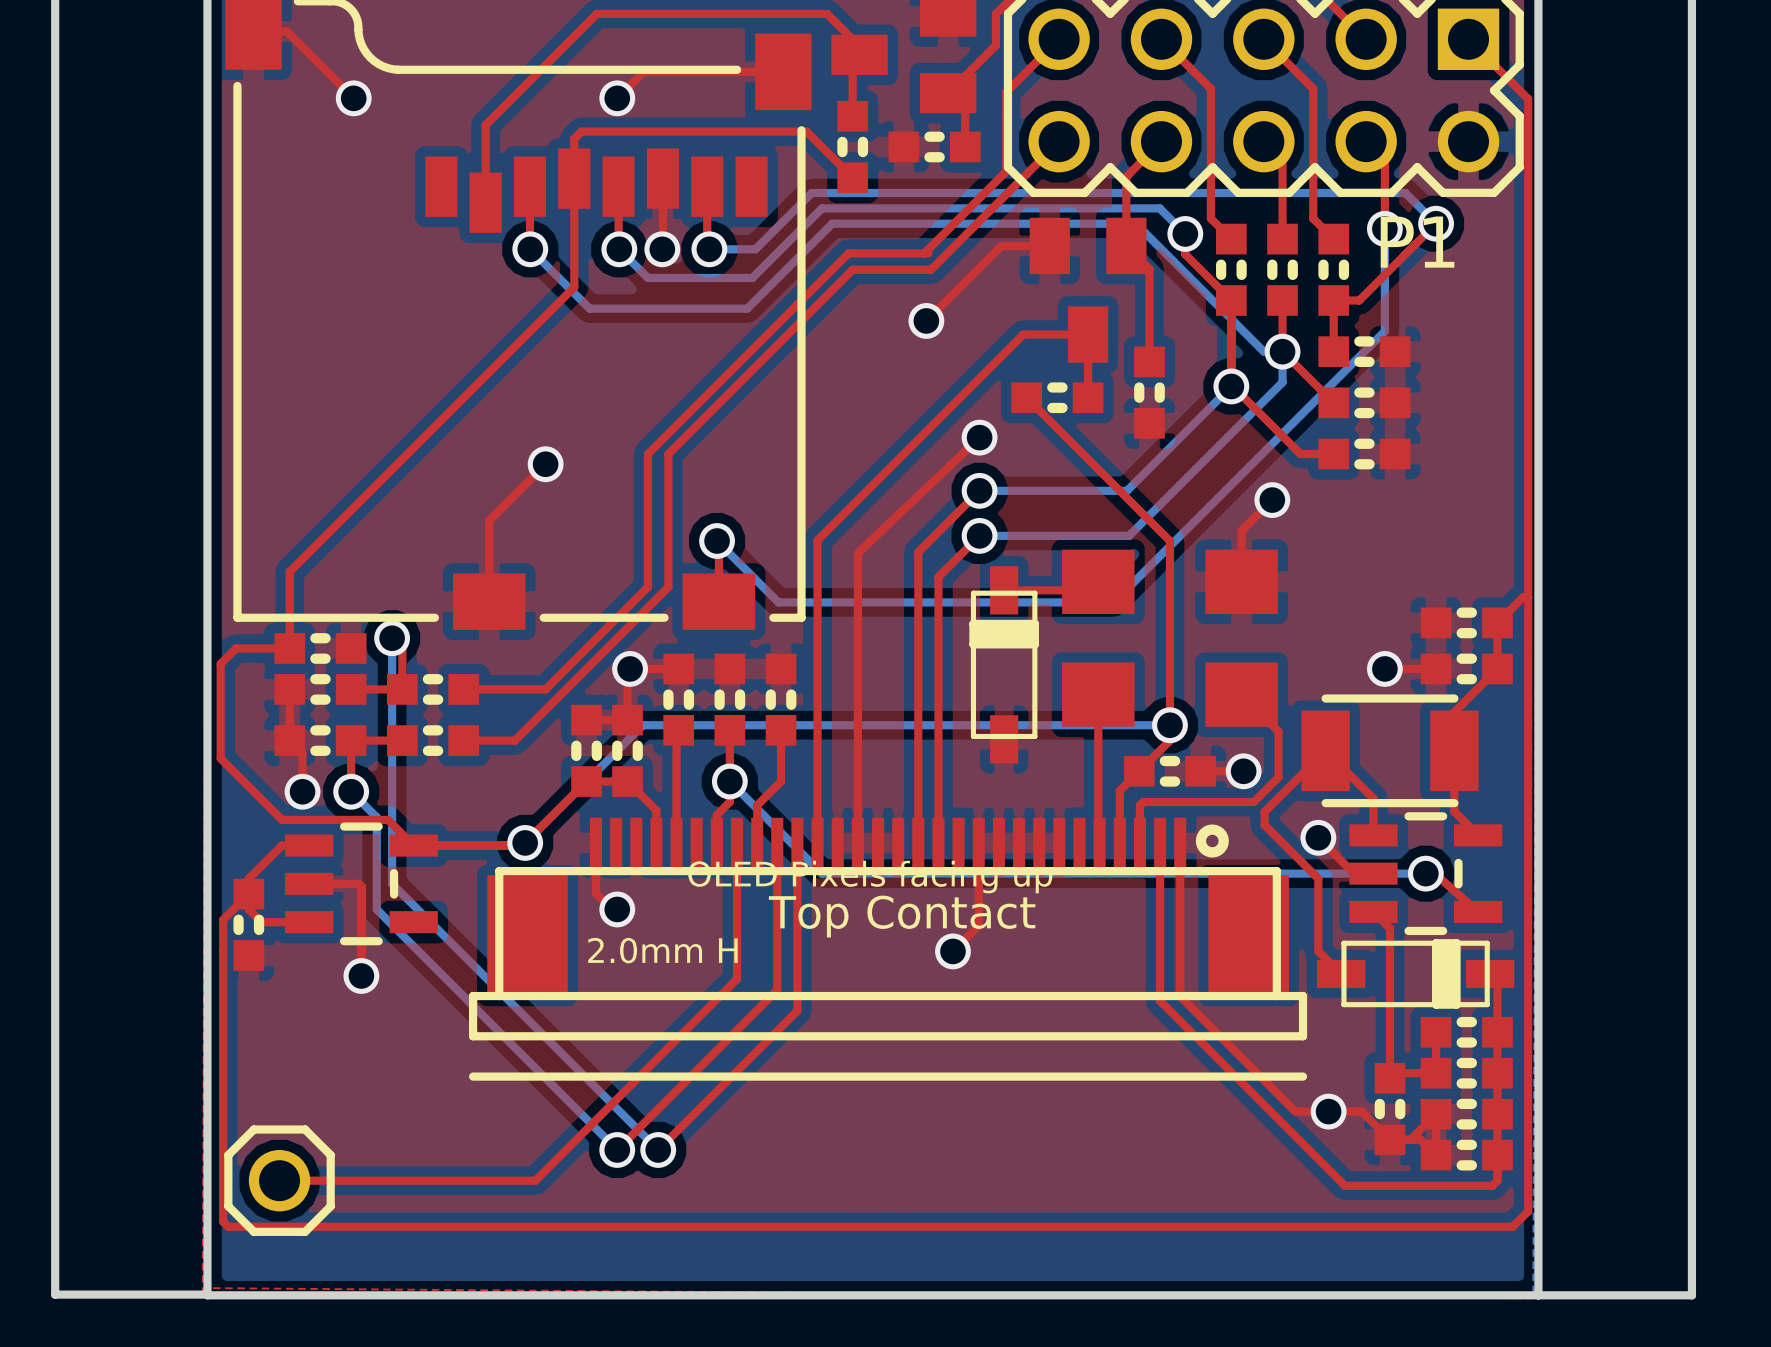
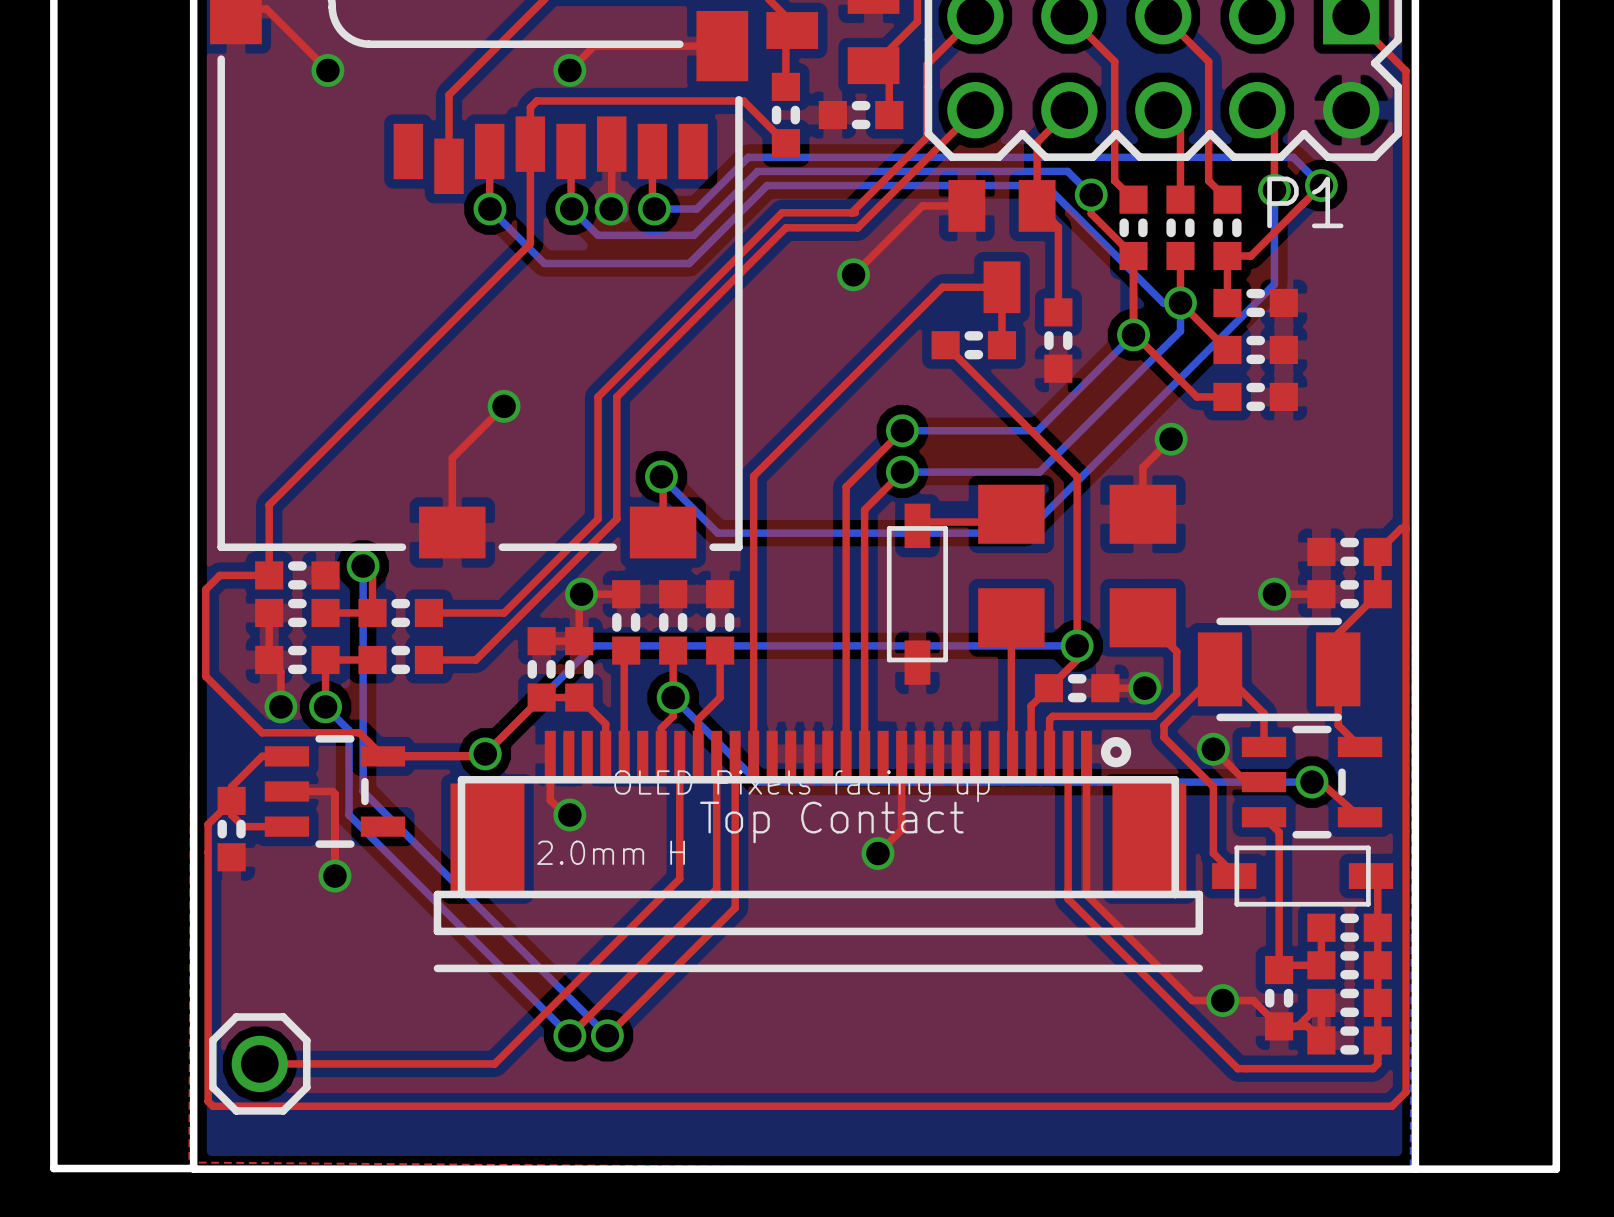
top track: (979, 437) (857, 553) (857, 842) -> none
via: (979, 437) -> none
part footprint: [969, 566, 1039, 764] -> [886, 503, 948, 685]
part footprint: [1316, 939, 1515, 1009] -> [1212, 845, 1394, 907]

